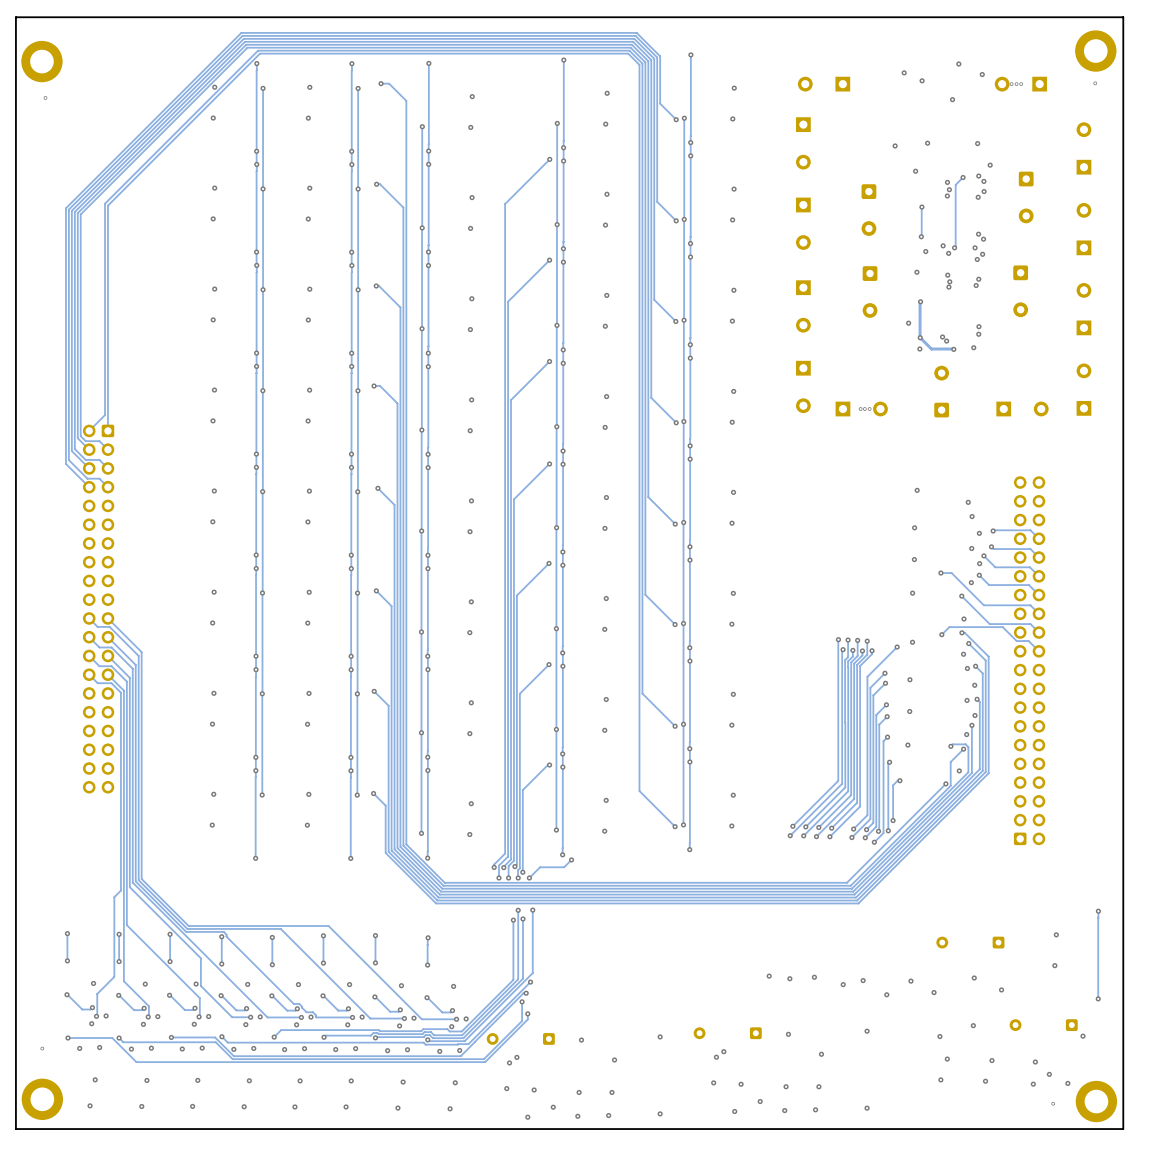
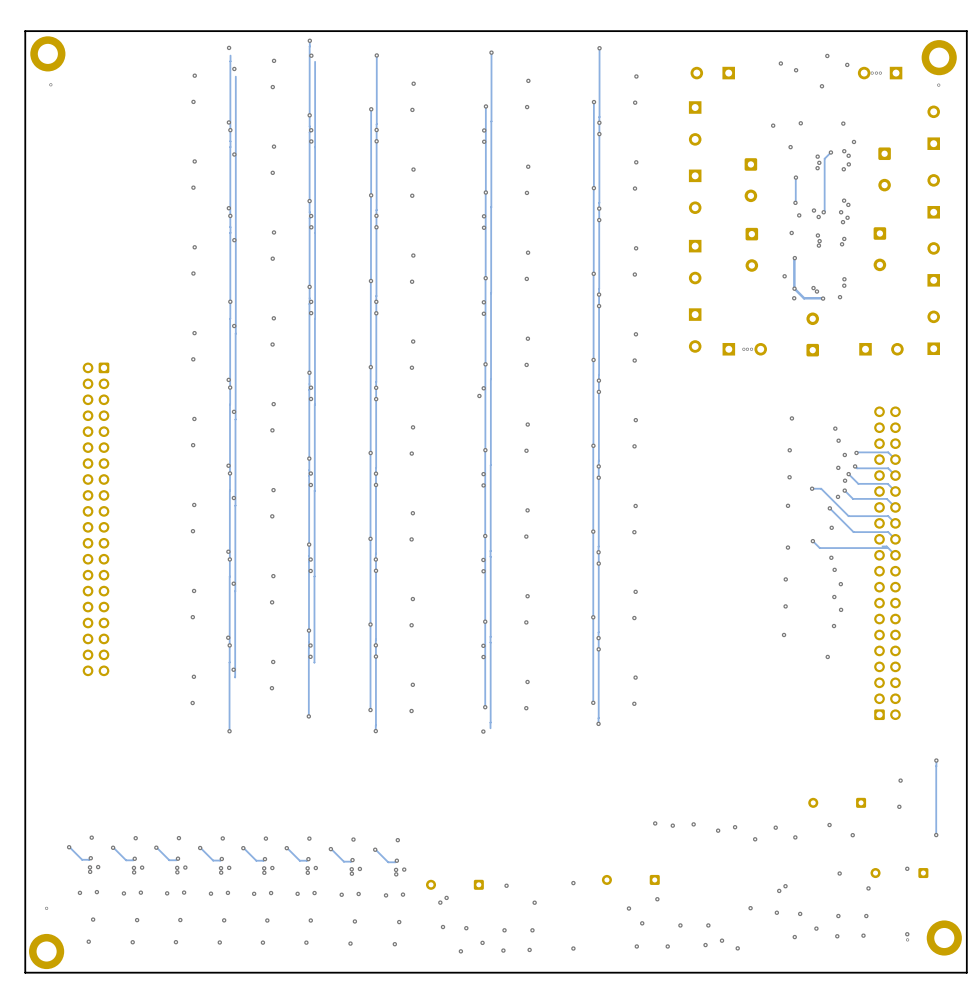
board edge: (1123, 17) (15, 17) (15, 1129) (1123, 1129) (1123, 17) -> (966, 31) (966, 972) (25, 972) (25, 31) (966, 31)
via: none -> (309, 40)
part position: (1095, 51) -> (939, 57)
via: none -> (229, 47)
via: (256, 63) -> none
track: (351, 63) (350, 858) -> (309, 40) (308, 716)
via: none -> (274, 60)
via: none -> (234, 68)
track: (381, 83) (389, 83) (406, 100) (406, 844) (444, 882) (846, 882) (945, 783) -> none
via: (381, 83) -> none
via position: (1095, 83) -> (938, 85)
via: (309, 87) -> none
via: (263, 88) -> none
track: (358, 88) (357, 795) -> (315, 61) (314, 662)
via: (358, 88) -> none
via: none -> (272, 87)
via: (308, 118) -> none
track: (676, 119) (660, 103) (660, 56) (636, 32) (241, 32) (65, 208) (65, 463) (89, 487) -> none
via: (676, 119) -> none
via: none -> (309, 115)
via: none -> (228, 122)
via: (563, 147) -> none
via: none -> (484, 130)
track: (549, 159) (505, 204) (505, 853) (494, 864) (494, 867) -> none
via: (549, 159) -> none
via: (563, 161) -> none
via: (256, 164) -> none
via: none -> (484, 141)
via: none -> (273, 146)
via: none -> (234, 154)
track: (376, 184) (380, 184) (403, 207) (403, 845) (443, 885) (850, 885) (950, 785) (950, 762) (963, 749) -> none
via: (376, 184) -> none
via: (263, 188) -> none
via: (309, 188) -> none
via: (358, 189) -> none
via: none -> (272, 172)
via: (308, 219) -> none
track: (676, 220) (657, 201) (657, 57) (635, 35) (242, 35) (68, 209) (68, 460) (87, 478) (99, 478) (107, 487) -> none
via: (676, 220) -> none
via: none -> (309, 201)
via: none -> (228, 208)
via: (563, 248) -> none
via: none -> (484, 216)
track: (549, 260) (508, 301) (508, 856) (499, 865) (499, 877) -> none
via: (549, 260) -> none
via: (563, 262) -> none
via: (256, 265) -> none
via: none -> (484, 227)
via: none -> (273, 232)
via: none -> (234, 240)
track: (376, 286) (379, 286) (400, 307) (400, 846) (442, 888) (852, 888) (968, 772) (968, 747) (965, 744) (952, 744) (950, 746) -> none
via: (376, 286) -> none
via: (263, 289) -> none
via: (309, 289) -> none
via: (358, 289) -> none
via: none -> (272, 258)
via: (308, 320) -> none
track: (675, 321) (654, 299) (654, 58) (634, 38) (243, 38) (71, 210) (71, 451) (89, 468) -> none
via: (675, 321) -> none
via: none -> (309, 286)
via: (563, 349) -> none
via: none -> (483, 302)
track: (549, 361) (511, 400) (511, 859) (503, 867) -> none
via: (549, 361) -> none
via: (563, 363) -> none
via: (256, 366) -> none
via: none -> (483, 313)
via: none -> (273, 318)
via: none -> (234, 326)
track: (374, 386) (380, 386) (397, 403) (397, 848) (441, 891) (853, 891) (971, 772) (971, 725) -> none
via: (374, 386) -> none
via: (262, 390) -> none
via: (309, 390) -> none
via: (357, 390) -> none
via: none -> (272, 344)
via: (308, 420) -> none
track: (676, 422) (651, 397) (651, 59) (633, 41) (245, 41) (74, 211) (74, 449) (85, 459) (99, 459) (107, 468) -> none
via: (676, 422) -> none
track: (89, 430) (105, 415) (105, 203) (258, 50) (629, 50) (642, 63) (642, 693) (675, 726) -> none
track: (107, 430) (107, 205) (260, 53) (628, 53) (639, 64) (639, 791) (675, 826) -> none
via: none -> (309, 372)
via: none -> (228, 379)
track: (89, 449) (77, 438) (77, 213) (246, 44) (631, 44) (648, 61) (648, 497) (675, 524) -> none
track: (107, 449) (99, 441) (85, 441) (80, 436) (80, 214) (247, 47) (630, 47) (645, 62) (645, 594) (675, 624) -> none
via: (563, 451) -> none
via: none -> (483, 388)
track: (549, 463) (513, 499) (513, 860) (508, 866) (508, 877) -> none
via: (563, 464) -> none
via: (256, 467) -> none
via: none -> (273, 404)
via: none -> (234, 411)
track: (377, 488) (394, 504) (394, 849) (439, 894) (854, 894) (979, 769) (979, 702) (977, 699) -> none
via: (377, 488) -> none
via: (262, 491) -> none
via: (309, 491) -> none
via: (357, 491) -> none
via: none -> (272, 430)
via: (307, 521) -> none
via: (675, 524) -> none
via: none -> (309, 458)
via: none -> (228, 465)
via: (562, 552) -> none
via: none -> (483, 474)
track: (549, 563) (516, 595) (516, 864) (514, 866) -> none
via: (549, 563) -> none
via: (562, 565) -> none
via: (256, 568) -> none
via: none -> (483, 485)
via: none -> (273, 490)
via: none -> (233, 498)
track: (376, 590) (391, 606) (391, 850) (438, 897) (856, 897) (982, 770) (982, 673) (975, 666) -> none
via: (376, 590) -> none
via: (309, 592) -> none
via: (262, 593) -> none
via: (357, 593) -> none
via: none -> (272, 516)
track: (89, 618) (97, 626) (109, 626) (138, 655) (138, 880) (187, 928) (280, 928) (370, 1018) (404, 1018) -> none
track: (107, 618) (141, 652) (141, 878) (188, 926) (328, 926) (421, 1019) (456, 1019) -> none
via: (307, 623) -> none
via: (675, 624) -> none
track: (961, 632) (964, 632) (988, 656) (988, 773) (858, 903) (436, 903) (385, 852) (385, 805) (373, 793) -> none
via: (961, 632) -> none
track: (941, 634) (949, 627) (1002, 627) (1016, 641) (1023, 641) -> (812, 541) (819, 548) (888, 548)
track: (89, 637) (99, 647) (111, 647) (132, 668) (132, 882) (267, 1017) (301, 1017) -> none
track: (107, 637) (135, 664) (135, 881) (186, 931) (223, 931) (293, 1003) (299, 1003) (306, 1012) (312, 1012) (316, 1017) (352, 1017) -> none
via: none -> (309, 544)
track: (838, 639) (838, 780) (792, 826) -> none
via: (838, 639) -> none
track: (848, 640) (848, 657) (845, 660) (845, 787) (805, 826) -> none
via: (848, 640) -> none
track: (857, 640) (857, 655) (851, 662) (851, 795) (818, 827) -> none
via: (857, 640) -> none
track: (867, 641) (867, 654) (857, 664) (857, 802) (831, 828) -> none
via: (867, 641) -> none
track: (968, 643) (985, 660) (985, 772) (857, 900) (437, 900) (388, 851) (388, 705) (374, 691) -> none
via: (968, 643) -> none
via: none -> (228, 551)
track: (897, 647) (867, 676) (867, 815) (853, 829) -> none
via: (897, 647) -> none
track: (843, 649) (842, 783) (790, 835) -> none
via: (843, 649) -> none
track: (852, 650) (852, 656) (848, 661) (848, 791) (803, 835) -> none
via: (852, 650) -> none
track: (862, 650) (862, 655) (854, 663) (854, 798) (816, 836) -> none
via: (862, 650) -> none
track: (872, 650) (872, 654) (860, 666) (860, 806) (829, 836) -> none
via: (872, 650) -> none
via: (562, 652) -> none
track: (89, 655) (99, 666) (111, 666) (126, 681) (126, 925) (199, 998) (199, 1016) -> none
track: (107, 655) (129, 677) (129, 887) (200, 958) (200, 986) (232, 1017) (250, 1017) -> none
via: none -> (483, 559)
track: (549, 664) (519, 693) (519, 868) (518, 870) (518, 877) -> none
via: (549, 664) -> none
via: (562, 666) -> none
via: (975, 666) -> none
via: (256, 669) -> none
via: none -> (483, 571)
track: (884, 673) (870, 687) (870, 819) (851, 837) -> none
via: (884, 673) -> none
track: (89, 674) (97, 683) (111, 683) (120, 692) (120, 890) (114, 897) (114, 976) (97, 993) (96, 1016) -> none
track: (107, 674) (123, 690) (123, 981) (148, 1006) (148, 1016) -> none
via: none -> (273, 576)
track: (885, 683) (873, 695) (873, 822) (866, 829) -> none
via: (885, 683) -> none
via: none -> (233, 583)
via: (374, 691) -> none
via: (262, 693) -> none
via: (309, 693) -> none
via: (357, 693) -> none
via: (977, 699) -> none
track: (886, 704) (876, 714) (876, 826) (865, 837) -> none
via: (886, 704) -> none
via: none -> (272, 602)
track: (887, 716) (879, 724) (878, 831) -> none
via: (887, 716) -> none
via: (307, 724) -> none
via: (971, 725) -> none
via: (675, 726) -> none
track: (887, 737) (883, 741) (883, 833) (874, 842) -> none
via: (887, 737) -> none
via: none -> (308, 630)
via: (950, 746) -> none
via: none -> (228, 637)
via: (963, 749) -> none
via: (562, 753) -> none
via: none -> (483, 645)
track: (889, 762) (888, 830) -> none
via: (889, 762) -> none
track: (549, 765) (522, 790) (522, 872) -> none
via: (549, 765) -> none
via: (562, 767) -> none
via: (255, 770) -> none
via: none -> (483, 657)
via: none -> (273, 661)
track: (899, 780) (893, 785) (893, 820) -> none
via: (899, 780) -> none
via: (945, 783) -> none
via: none -> (233, 669)
via: (373, 793) -> none
via: (308, 794) -> none
via: (262, 795) -> none
via: (357, 795) -> none
via: none -> (271, 688)
via: (893, 820) -> none
via: (307, 825) -> none
via: (675, 826) -> none
via: (792, 826) -> none
via: (805, 826) -> none
via: (818, 827) -> none
via: (831, 828) -> none
via: (853, 829) -> none
via: (866, 829) -> none
via: (888, 830) -> none
via: (878, 831) -> none
via: (790, 835) -> none
via: (803, 835) -> none
via: (816, 836) -> none
via: (829, 836) -> none
via: (851, 837) -> none
via: (865, 837) -> none
via: (874, 842) -> none
via: (562, 854) -> none
via position: (350, 858) -> (308, 716)
via: none -> (483, 731)
track: (571, 859) (564, 867) (540, 867) (529, 877) -> none
via: (571, 859) -> none
via: (514, 866) -> none
via: (494, 867) -> none
via: (503, 867) -> none
via: (522, 872) -> none
via: (499, 877) -> none
via: (508, 877) -> none
via: (518, 877) -> none
via: (529, 877) -> none
track: (518, 910) (518, 979) (462, 1035) (434, 1035) (430, 1032) (424, 1032) (422, 1034) (373, 1033) (370, 1035) (325, 1035) (324, 1037) -> none
via: (518, 910) -> none
track: (532, 910) (532, 973) (464, 1041) (427, 1039) -> none
via: (532, 910) -> none
track: (1098, 911) (1098, 998) -> (936, 760) (936, 835)
via position: (1098, 911) -> (936, 760)
via: none -> (900, 780)
track: (523, 918) (523, 978) (463, 1038) (432, 1038) (429, 1035) (423, 1037) (375, 1037) -> none
via: (523, 918) -> none
track: (513, 920) (513, 979) (461, 1031) (449, 1031) (447, 1029) (423, 1029) (421, 1031) (281, 1030) (274, 1037) -> none
via: (513, 920) -> none
track: (67, 933) (67, 960) -> none
via: (67, 933) -> none
track: (119, 934) (119, 961) -> none
via: (119, 934) -> none
track: (170, 934) (170, 961) -> none
via: (170, 934) -> none
via: (1056, 934) -> none
track: (323, 935) (323, 963) -> none
via: (323, 935) -> none
track: (375, 935) (375, 962) -> none
via: (375, 935) -> none
track: (221, 936) (221, 964) -> none
via: (221, 936) -> none
track: (272, 937) (272, 964) -> none
via: (272, 937) -> none
track: (428, 937) (427, 965) -> none
via: (428, 937) -> none
via: none -> (899, 806)
via: (67, 960) -> none
via: (119, 961) -> none
via: (170, 961) -> none
via: (375, 962) -> none
via: (323, 963) -> none
via: (221, 964) -> none
via: (272, 964) -> none
via: (427, 965) -> none
via: (1054, 965) -> none
via: none -> (655, 823)
via: none -> (693, 824)
via: none -> (829, 825)
via: none -> (672, 825)
via: none -> (735, 827)
via: none -> (775, 827)
via: none -> (718, 830)
via: (769, 976) -> none
via: (814, 977) -> none
via: (974, 977) -> none
via: (789, 978) -> none
via: (863, 980) -> none
via: none -> (852, 835)
via: none -> (936, 835)
via: (910, 981) -> none
track: (530, 982) (468, 1044) (227, 1042) (221, 1036) -> none
via: (530, 982) -> none
via: none -> (795, 837)
via: (843, 984) -> none
via: none -> (755, 839)
via: (1001, 989) -> none
via: (934, 992) -> none
track: (526, 993) (523, 993) (460, 1056) (233, 1056) (215, 1037) (171, 1037) -> none
via: (526, 993) -> none
via: (886, 994) -> none
via: (1098, 998) -> none
track: (522, 1001) (522, 1021) (483, 1059) (232, 1059) (215, 1042) (123, 1042) (119, 1038) -> none
via: (522, 1001) -> none
track: (527, 1013) (527, 1019) (485, 1062) (136, 1062) (112, 1038) (67, 1038) -> none
via: (527, 1013) -> none
via: (106, 1015) -> none
via: (96, 1016) -> none
via: (148, 1016) -> none
via: (157, 1016) -> none
via: (199, 1016) -> none
via: (208, 1016) -> none
via: (260, 1016) -> none
via: (250, 1017) -> none
via: (301, 1017) -> none
via: (311, 1017) -> none
via: (352, 1017) -> none
via: (362, 1017) -> none
via: none -> (89, 867)
via: none -> (98, 867)
via: none -> (142, 867)
via: none -> (185, 867)
via: (404, 1018) -> none
via: (414, 1018) -> none
via: (466, 1018) -> none
via: none -> (133, 867)
via: none -> (177, 867)
via: none -> (221, 868)
via: none -> (229, 867)
via: none -> (264, 868)
via: none -> (272, 868)
via: none -> (307, 868)
via: none -> (315, 868)
via: (456, 1019) -> none
via: none -> (351, 869)
via: none -> (359, 868)
via: none -> (907, 868)
via: none -> (396, 869)
via: none -> (404, 869)
via: (867, 1031) -> none
via: (788, 1034) -> none
via: (221, 1036) -> none
via: (939, 1036) -> none
via: (1082, 1036) -> none
via: (171, 1037) -> none
via: (274, 1037) -> none
via: (324, 1037) -> none
via: (375, 1037) -> none
via: (67, 1038) -> none
via: (119, 1038) -> none
via: (427, 1039) -> none
via: none -> (785, 886)
via: none -> (868, 888)
via: none -> (779, 890)
via position: (42, 1048) -> (46, 908)
via: (723, 1051) -> none
via: none -> (446, 897)
via: (821, 1054) -> none
via: none -> (657, 899)
via: (516, 1057) -> none
via: (716, 1057) -> none
via: none -> (440, 902)
via: (947, 1059) -> none
via: (991, 1060) -> none
via: (509, 1062) -> none
via: (1035, 1062) -> none
via: none -> (628, 908)
via: none -> (750, 908)
via: none -> (776, 912)
via: none -> (800, 913)
via: (1049, 1074) -> none
via: none -> (838, 916)
via: none -> (866, 916)
via: (940, 1079) -> none
via: (985, 1081) -> none
via: (713, 1082) -> none
via: (1067, 1083) -> none
via: (1033, 1084) -> none
via: none -> (816, 928)
via: none -> (907, 934)
via: none -> (863, 935)
part position: (42, 1099) -> (46, 951)
via: none -> (837, 936)
via: none -> (794, 937)
via: (760, 1101) -> none
via: none -> (722, 940)
via position: (867, 1108) -> (737, 948)
via: (784, 1110) -> none
via: none -> (667, 946)

